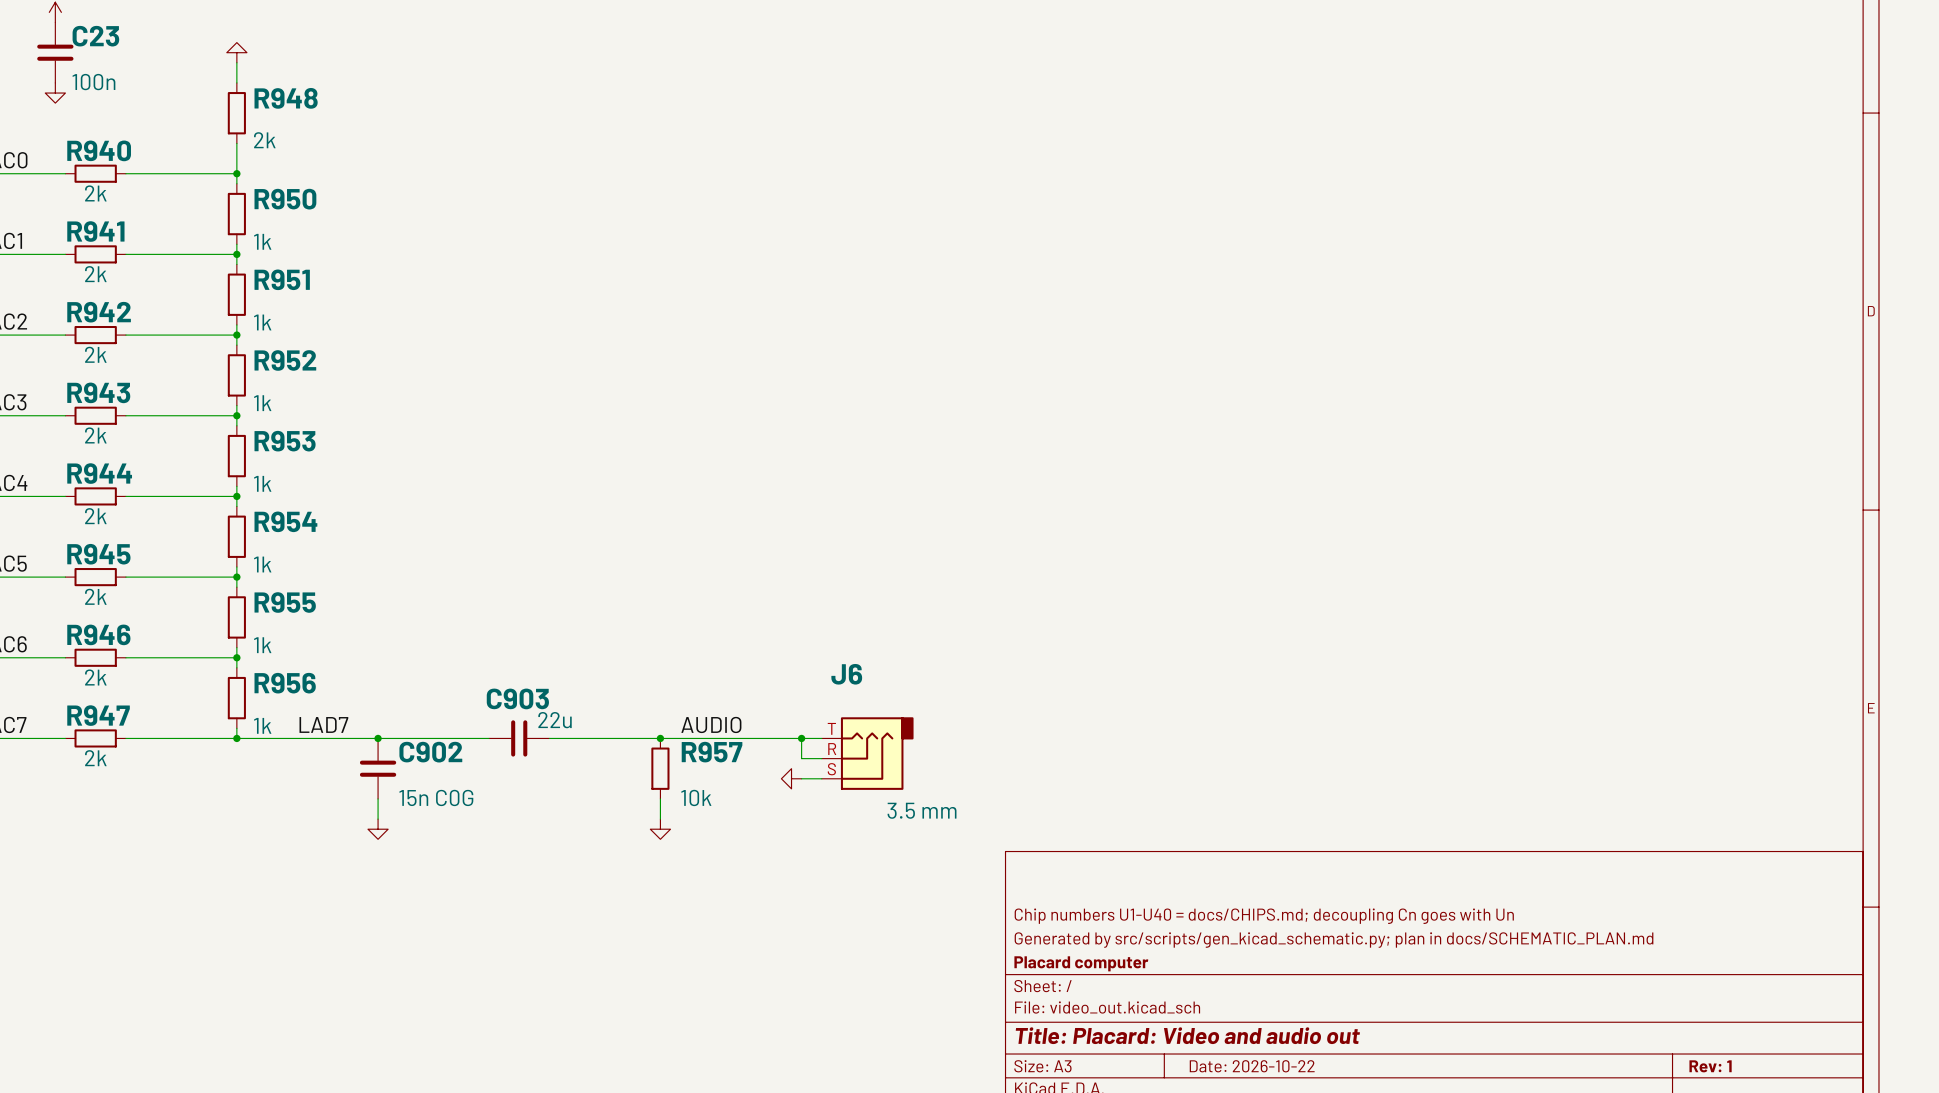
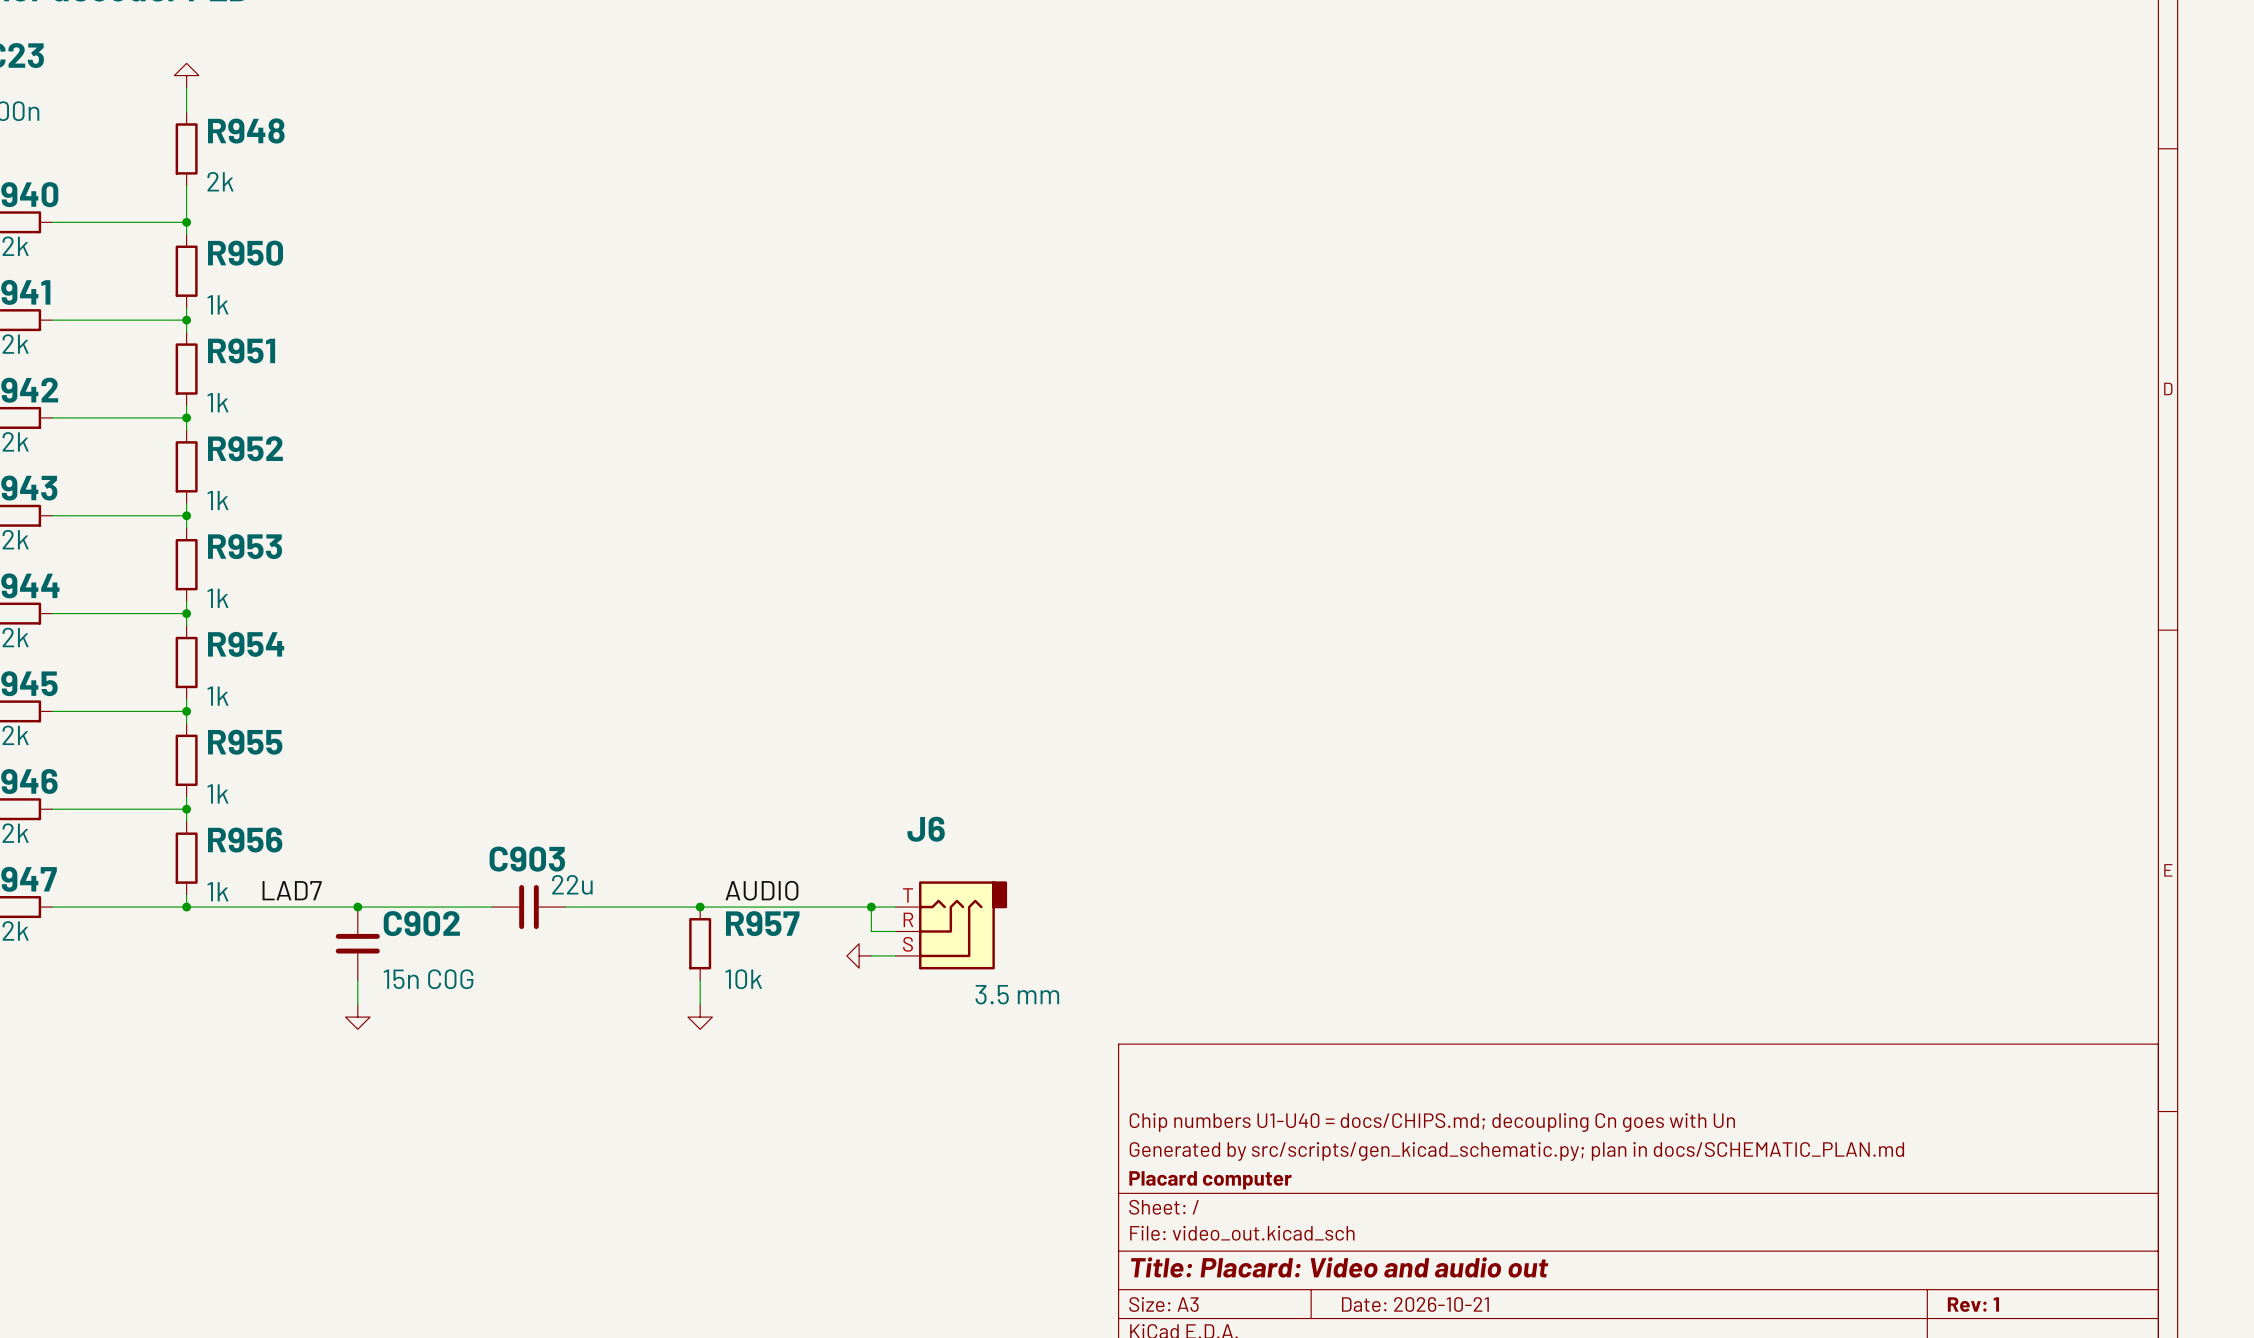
title block: Date: 2026-10-22 (1252, 1066) -> Date: 2026-10-21 (1415, 1304)

